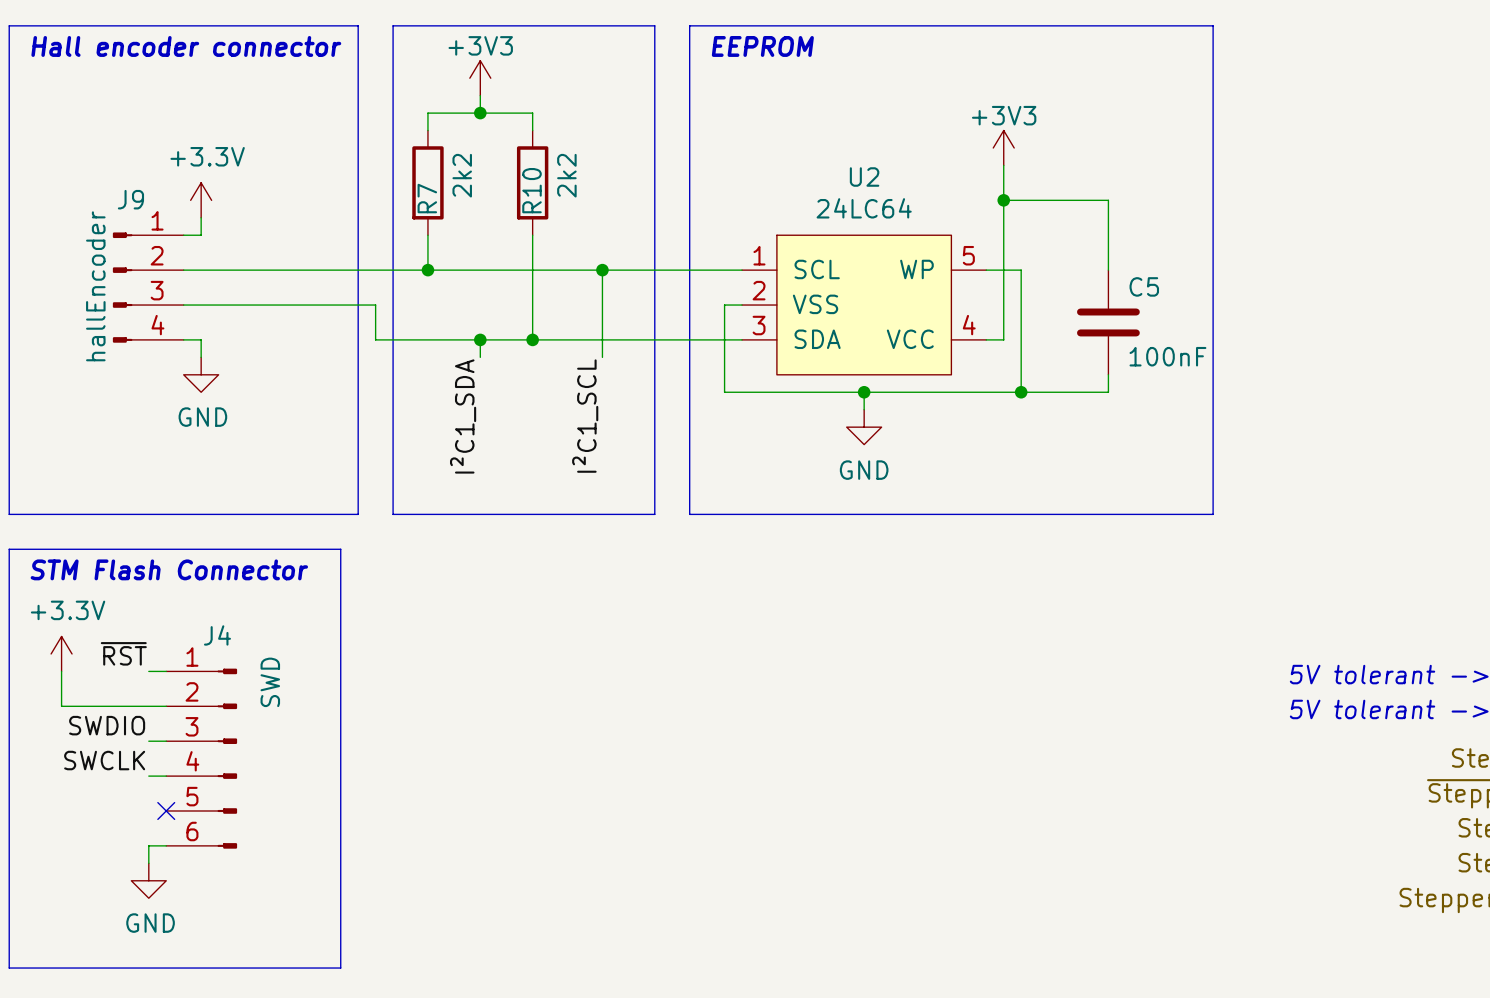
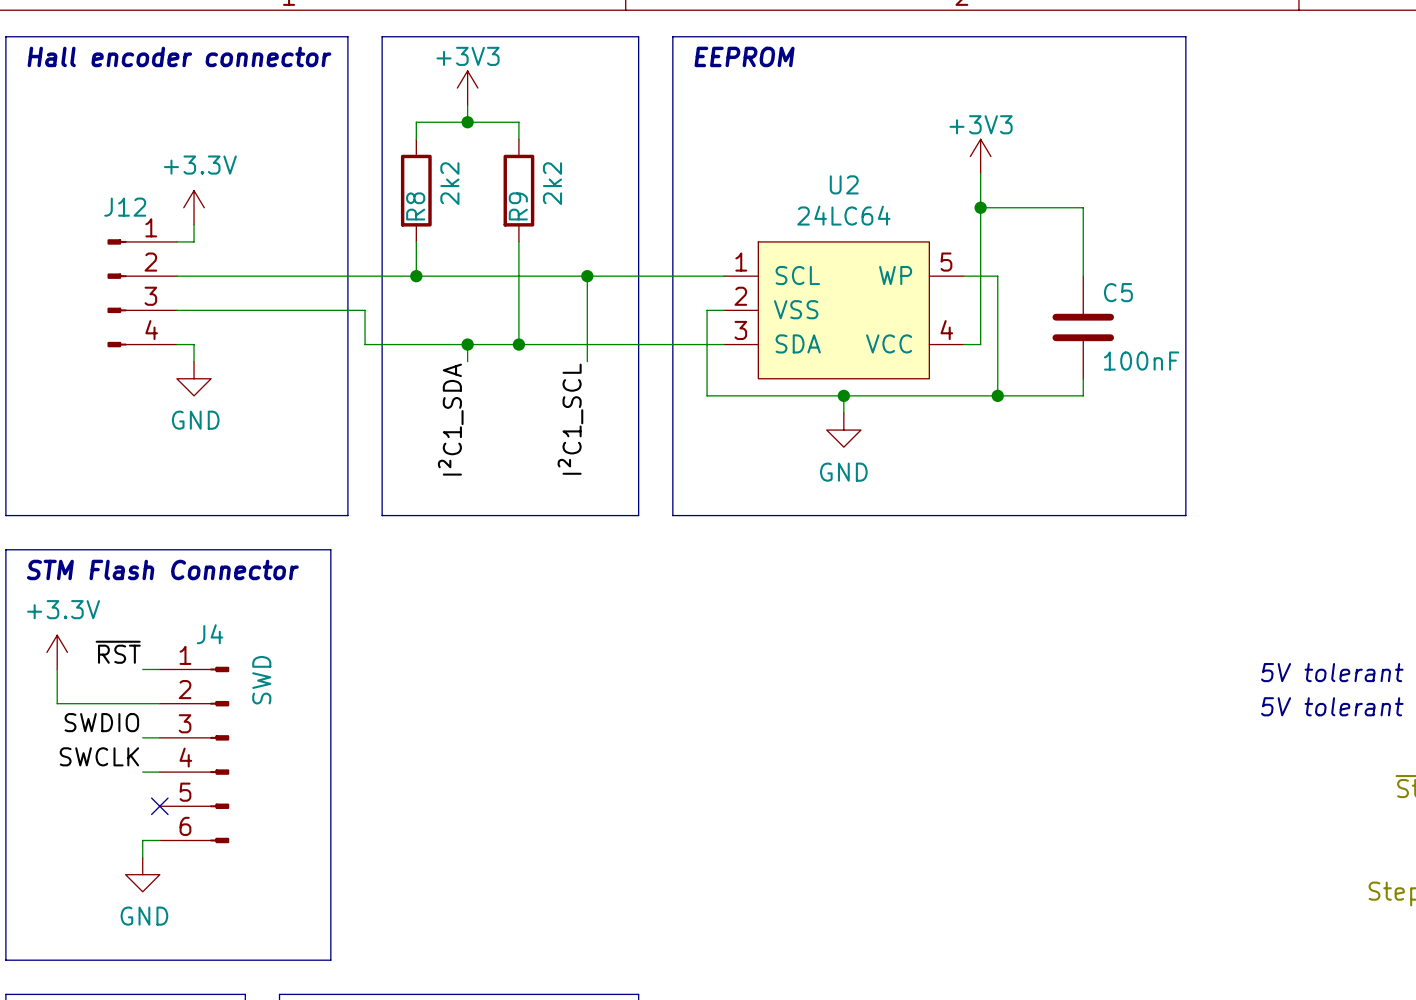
R10 name: R10 (532, 190) -> R9 (518, 206)
R7 name: R7 (427, 198) -> R8 (415, 206)
J9 name: J9 (130, 199) -> J12 (125, 207)
J9 value: hallEncoder (95, 286) -> none

